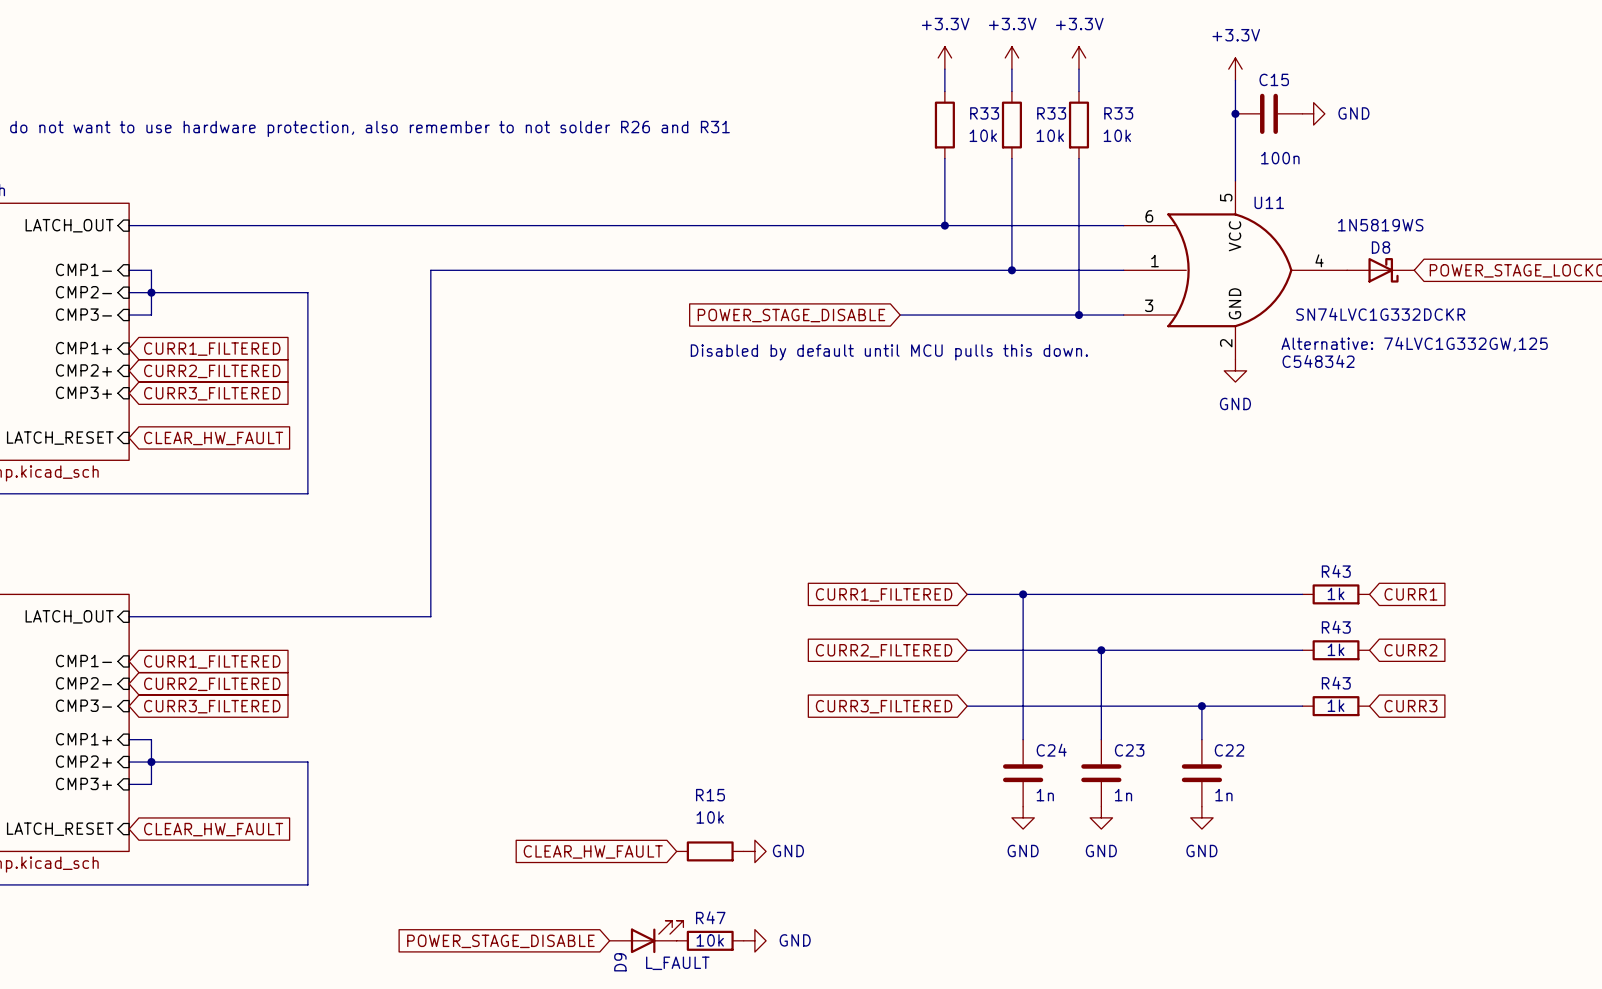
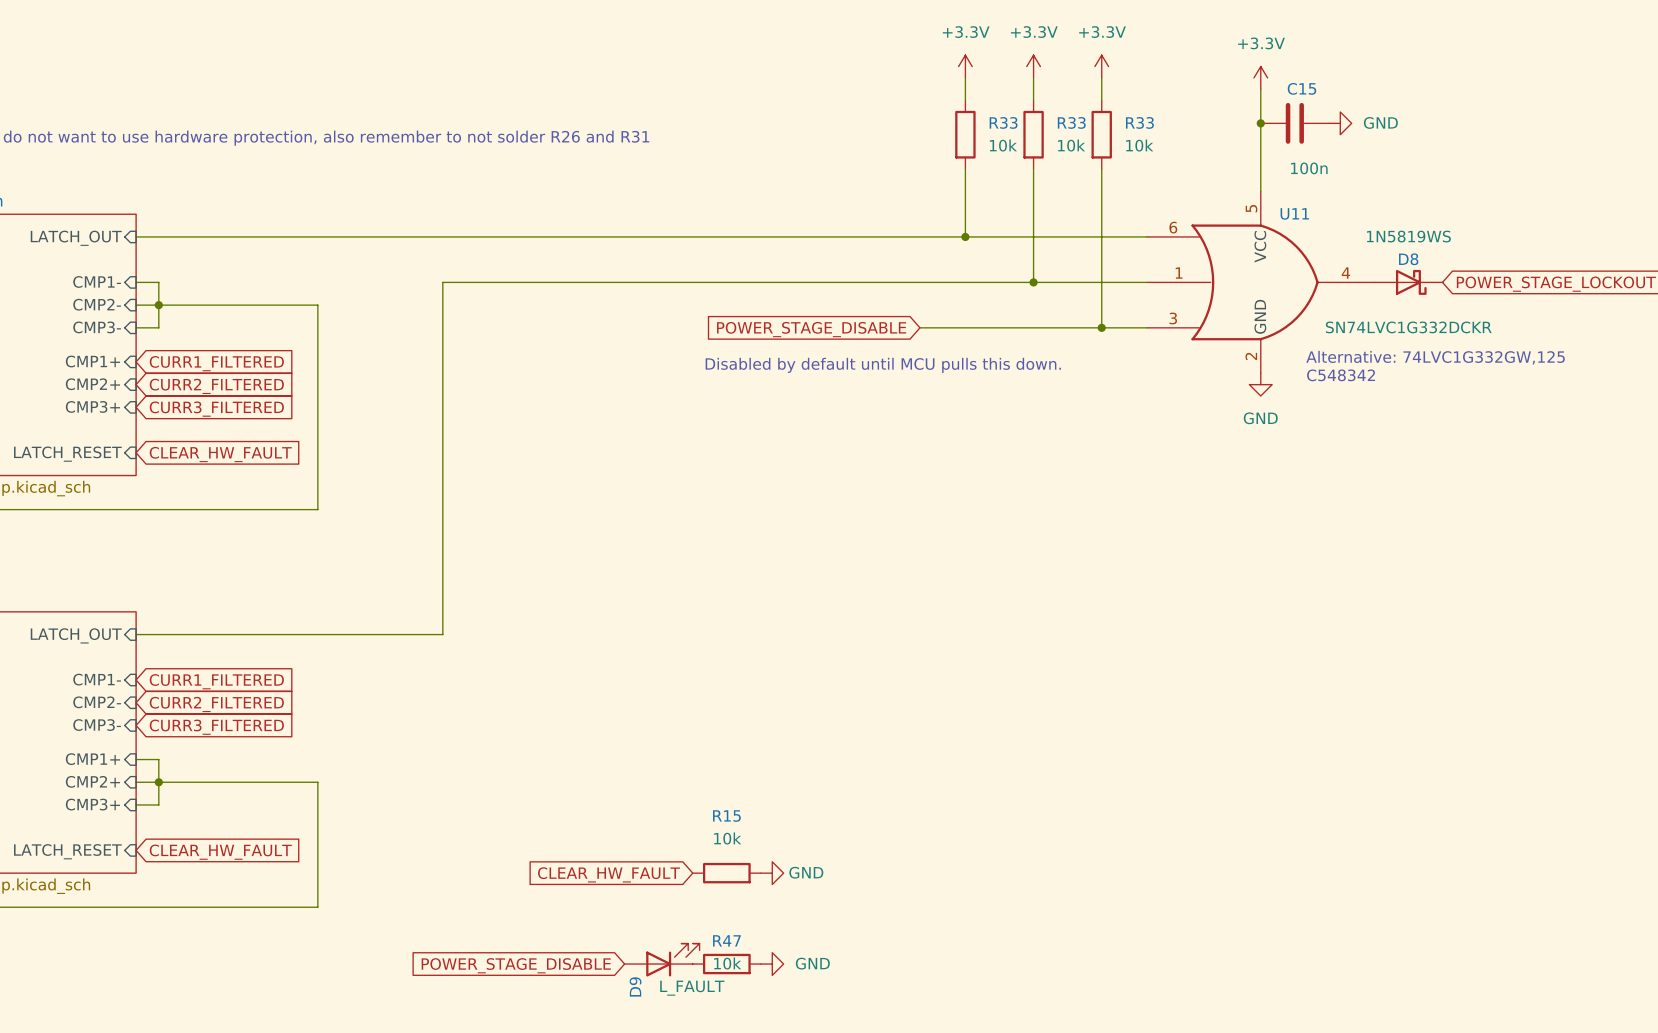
global label: CURR1_FILTERED (884, 594) -> none
wire: (967, 594) (1302, 594) -> none
wire: (1023, 594) (1023, 739) -> none
junction: (1023, 594) -> none
R43: 1k (1336, 594) -> none
global label: CURR1 (1410, 594) -> none
global label: CURR2_FILTERED (884, 650) -> none
wire: (967, 650) (1302, 650) -> none
wire: (1101, 650) (1101, 739) -> none
junction: (1101, 650) -> none
R43: 1k (1336, 650) -> none
global label: CURR2 (1410, 650) -> none
global label: CURR3_FILTERED (884, 706) -> none
wire: (967, 706) (1302, 706) -> none
wire: (1201, 706) (1201, 739) -> none
junction: (1201, 706) -> none
R43: 1k (1336, 706) -> none
global label: CURR3 (1410, 706) -> none
C24: 1n (1023, 773) -> none
C23: 1n (1101, 773) -> none
C22: 1n (1201, 773) -> none
power symbol: GND (1023, 817) -> none
power symbol: GND (1101, 817) -> none
power symbol: GND (1201, 817) -> none

